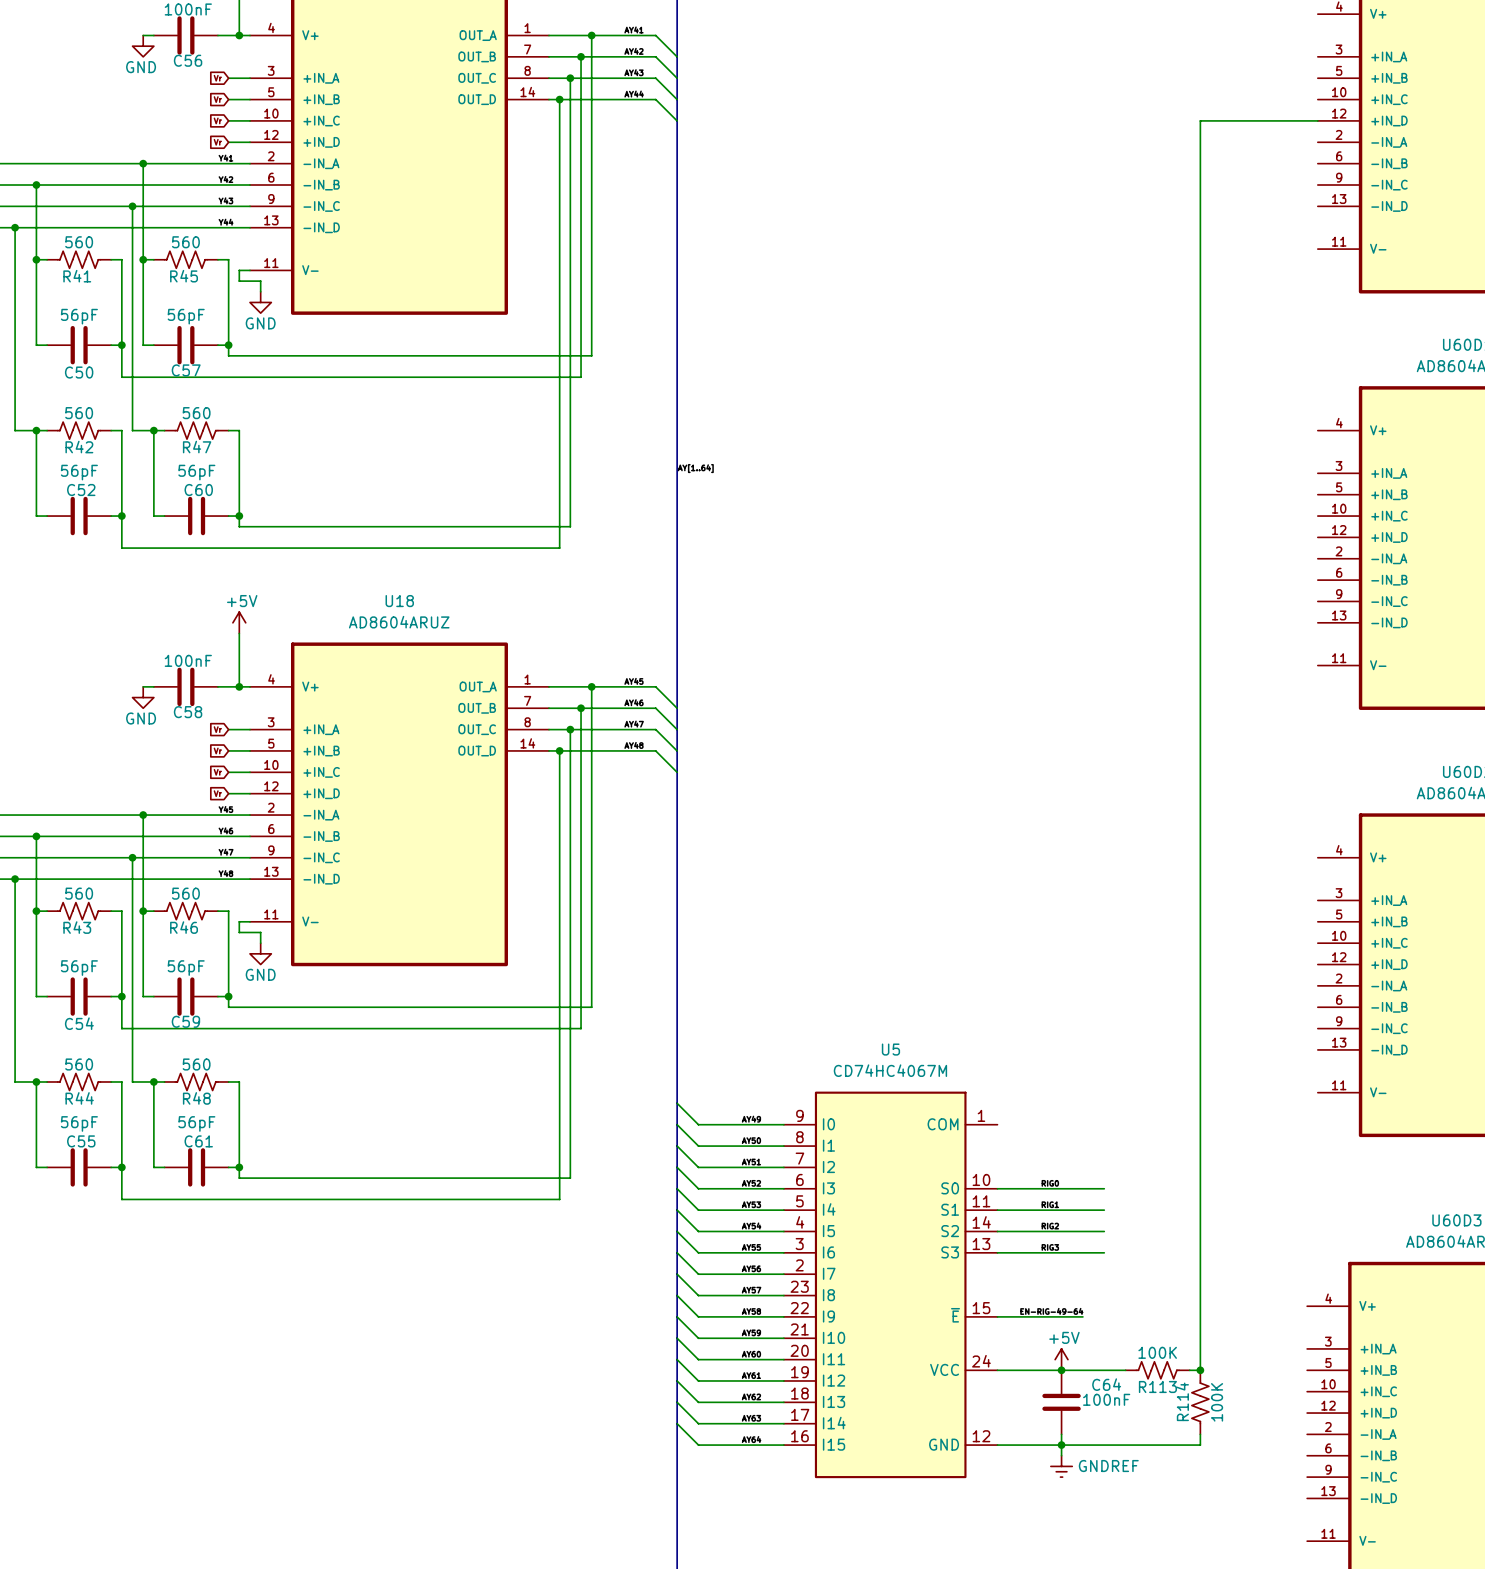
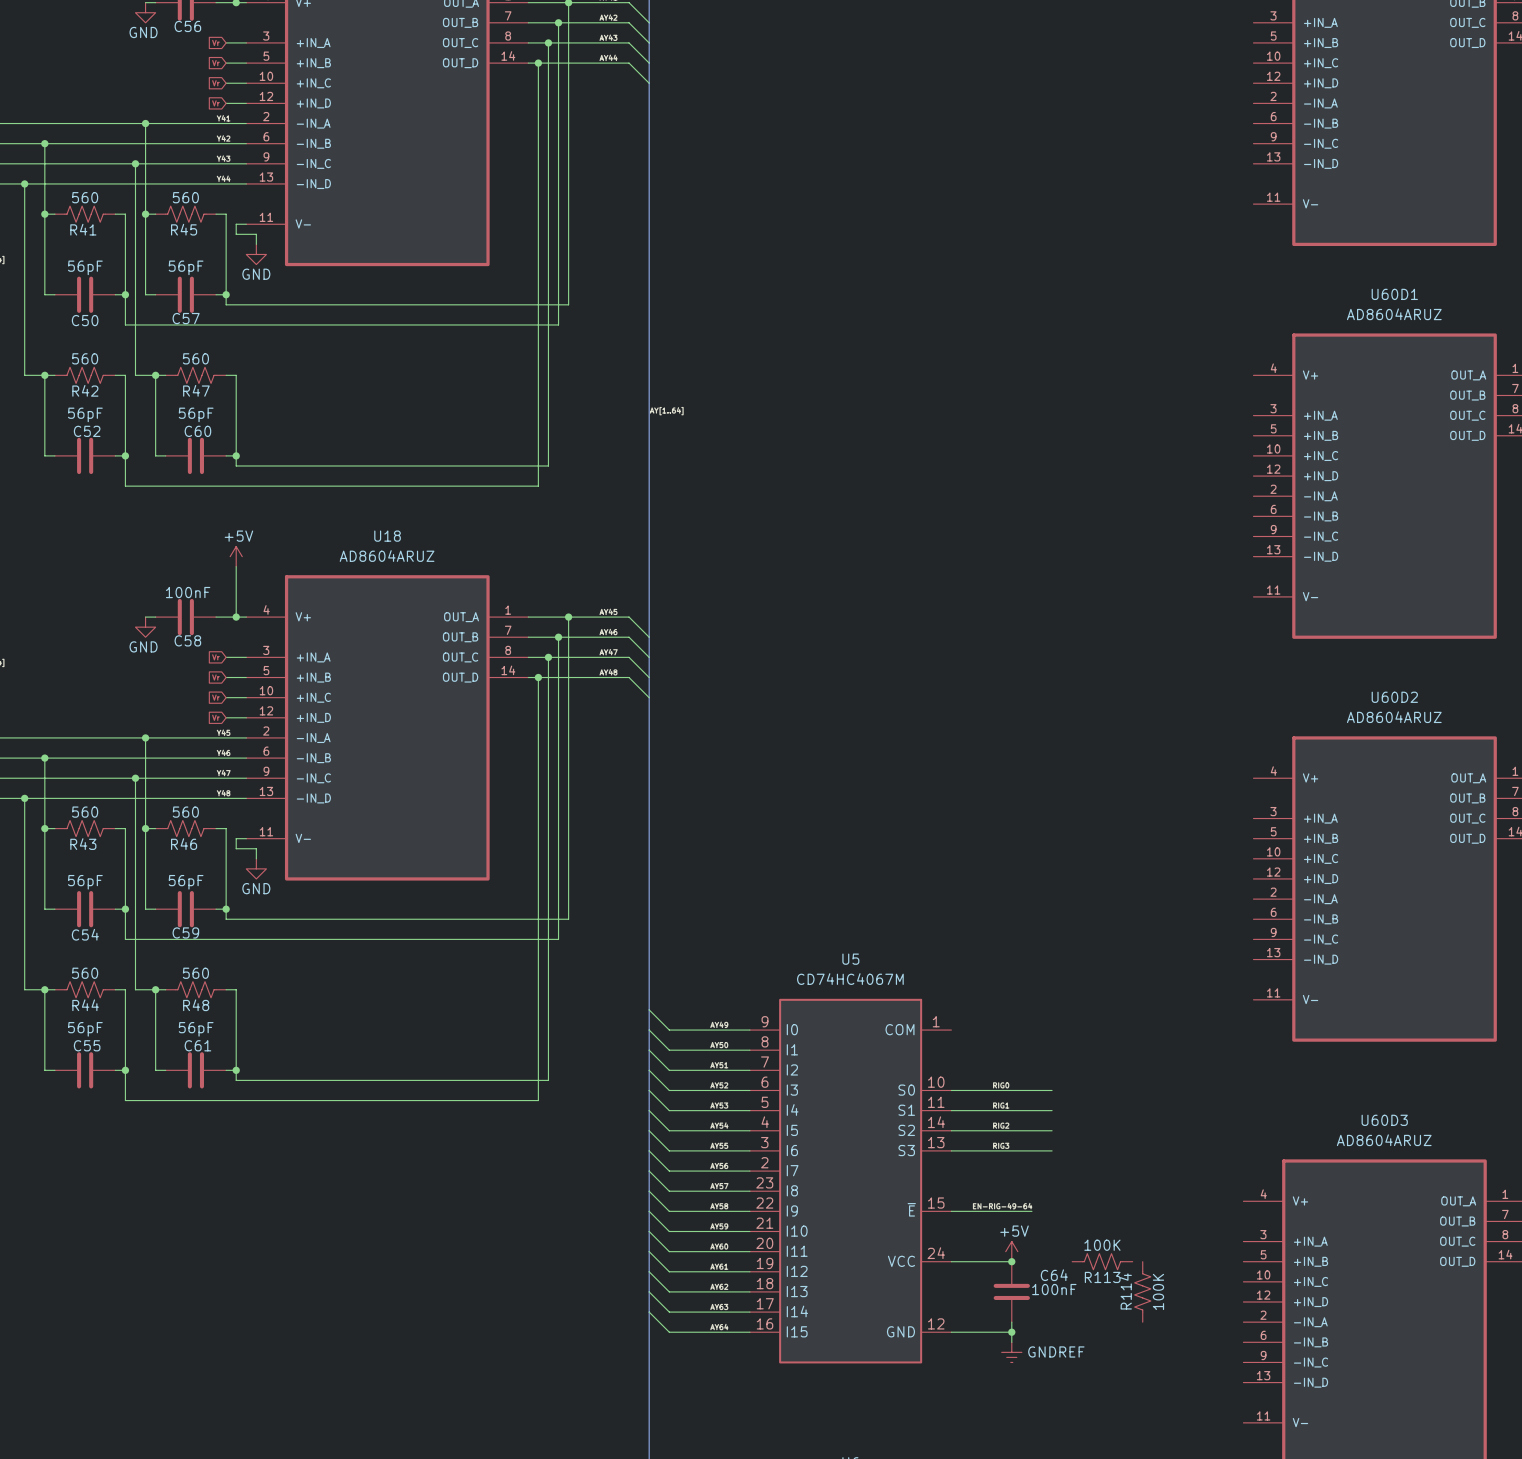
wire: (1317, 120) (1200, 120) (1200, 1370) (1189, 1370) -> none
wire: (1061, 1370) (1125, 1370) -> none
junction: (1200, 1370) -> none
wire: (1200, 1434) (1200, 1445) (1061, 1445) -> none

